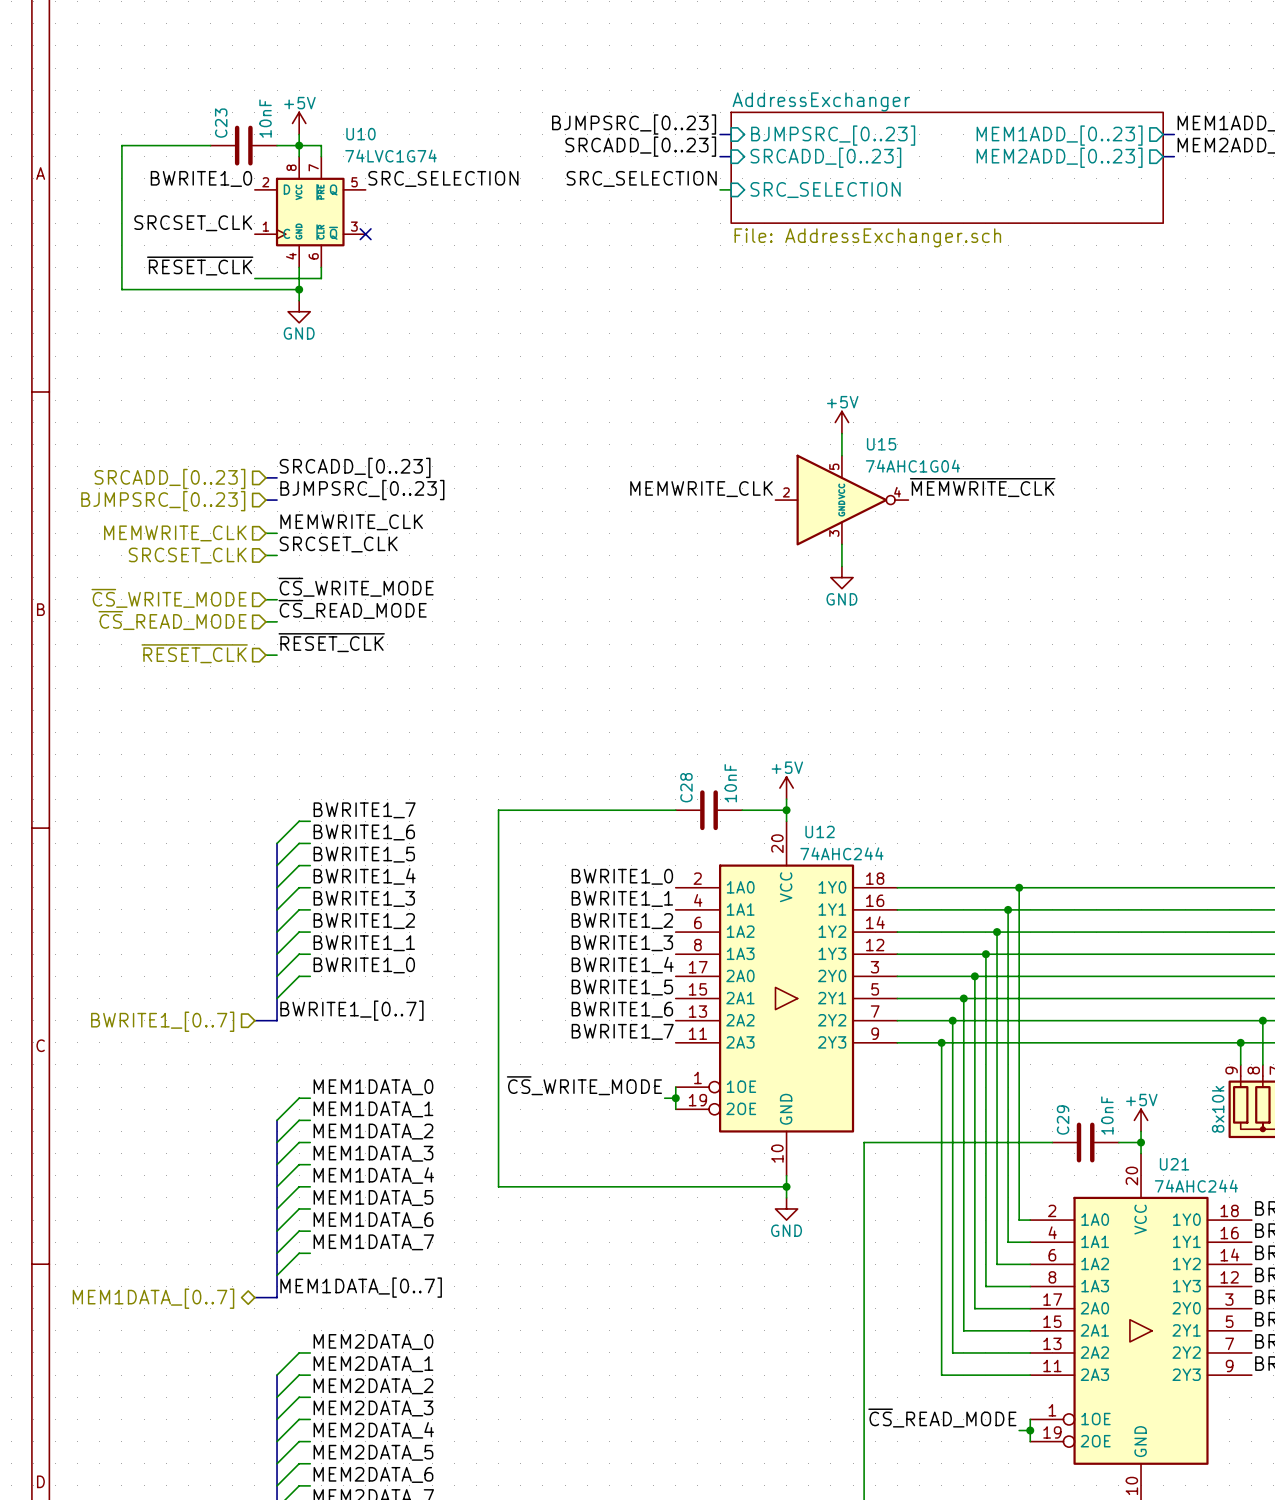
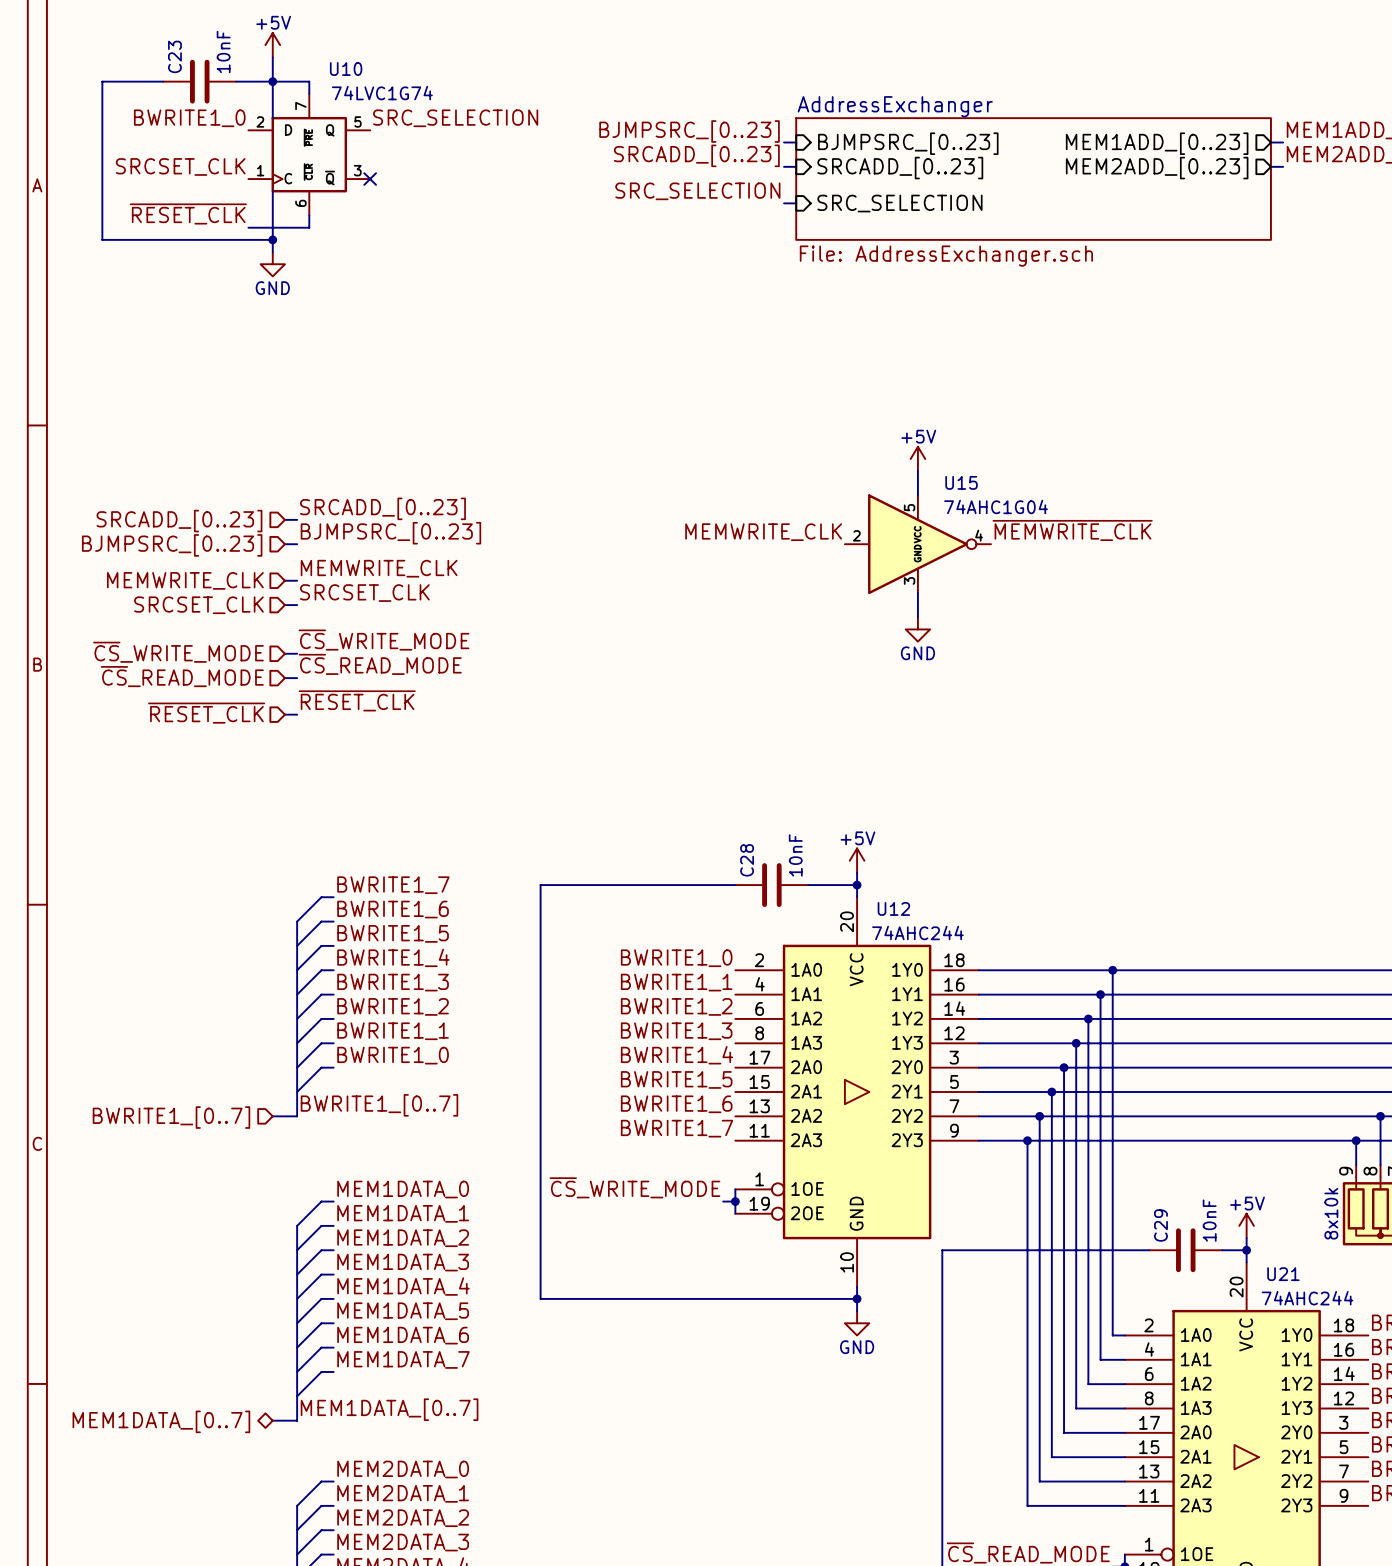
wire: none -> (272, 57) (272, 118)
wire: none -> (163, 81) (102, 81) (102, 239) (272, 239)
wire: none -> (236, 81) (309, 81) (309, 93)
junction: none -> (272, 81)
power symbol position: +5V (299, 123) -> +5V (272, 45)
wire: (299, 134) (299, 156) -> none
U10 name position: U10 (360, 134) -> U10 (346, 69)
wire: (210, 145) (121, 145) (121, 289) (299, 289) -> none
C23 position: (243, 145) -> (199, 81)
wire: (277, 145) (321, 145) (321, 156) -> none
junction: (299, 145) -> none
U10 value position: 74LVC1G74 (391, 155) -> 74LVC1G74 (382, 93)
U10 symbol: [254, 156, 366, 268] -> [248, 93, 371, 216]
no-connect mark: none -> (370, 179)
label position: BWRITE1_0 (201, 178) -> BWRITE1_0 (189, 118)
wire: none -> (272, 191) (272, 252)
label position: SRC_SELECTION (443, 178) -> SRC_SELECTION (455, 118)
wire: none -> (309, 215) (309, 227) (248, 227)
label position: SRCSET_CLK (193, 223) -> SRCSET_CLK (180, 166)
junction: none -> (272, 239)
no-connect mark: (365, 234) -> none
label position: ~{RESET_CLK} (200, 266) -> ~{RESET_CLK} (188, 213)
wire: (299, 267) (299, 300) -> none
wire: (321, 267) (321, 278) (254, 278) -> none
junction: (299, 289) -> none
power symbol position: GND (299, 311) -> GND (272, 264)

